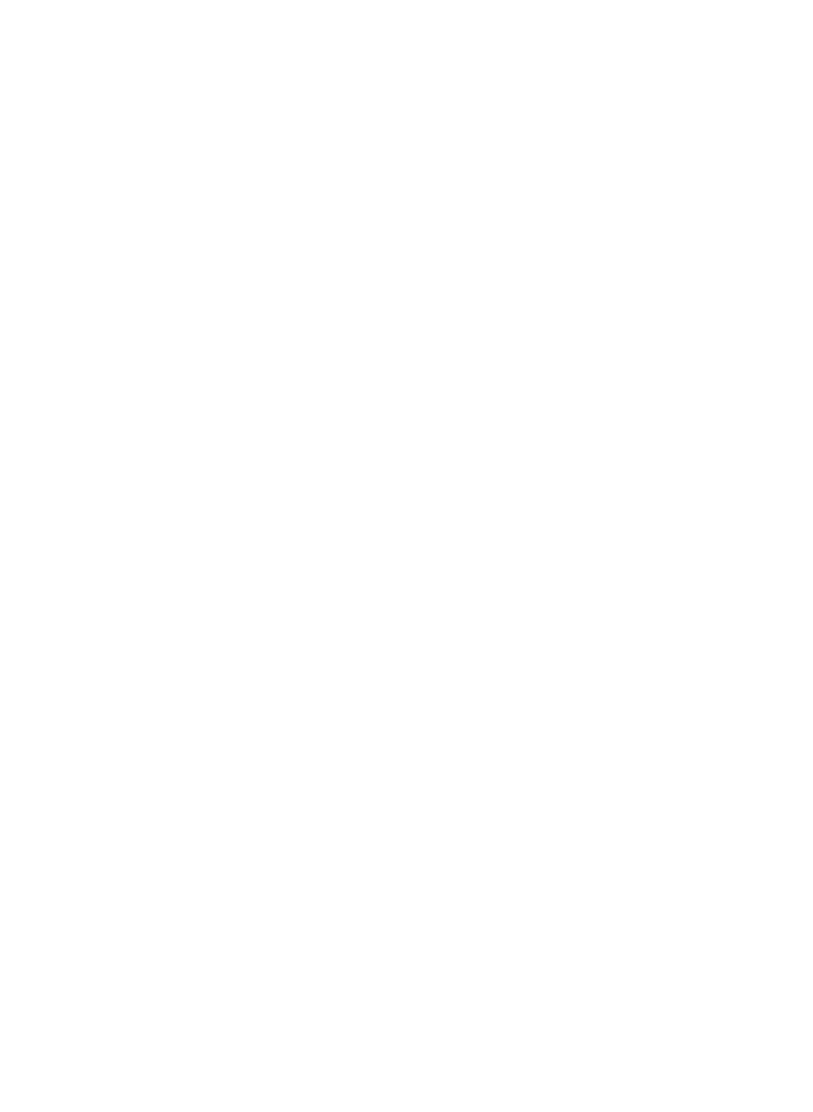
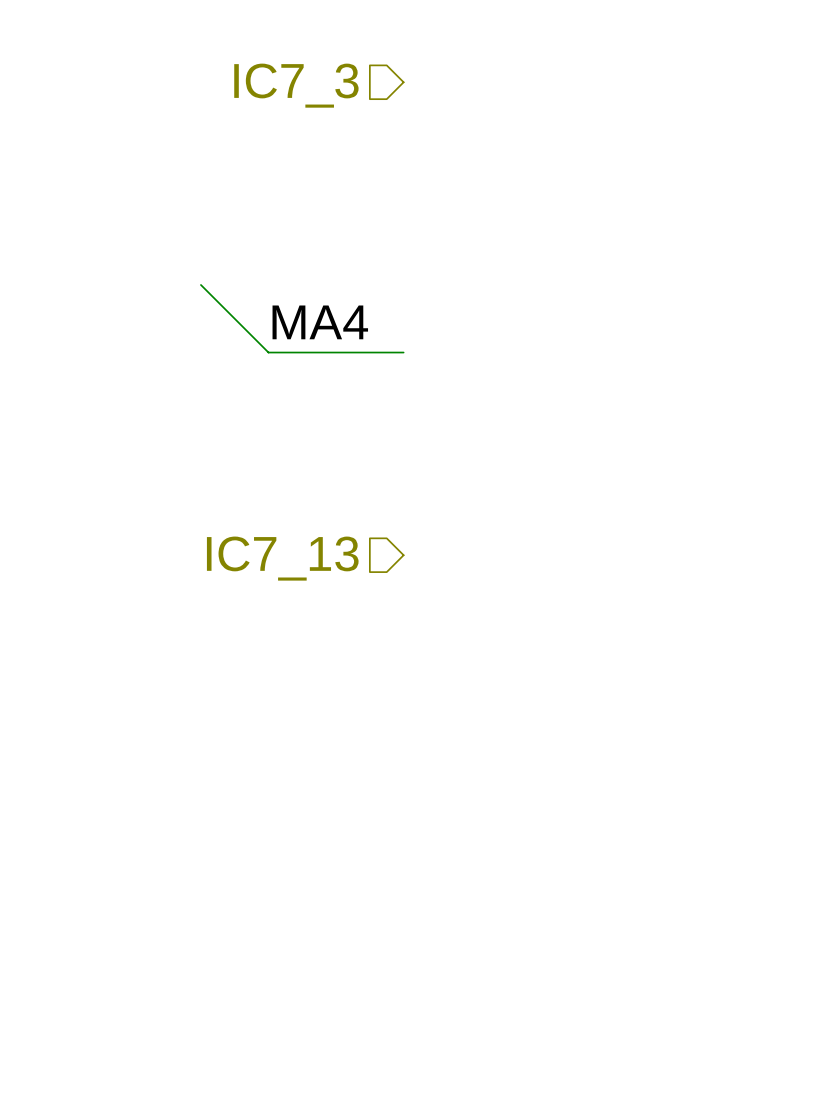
hierarchical label: none -> IC7_3 (296, 85)
wire: none -> (200, 284) (268, 352) (403, 352)
label: none -> MA4 (320, 322)
hierarchical label: none -> IC7_13 (282, 558)

